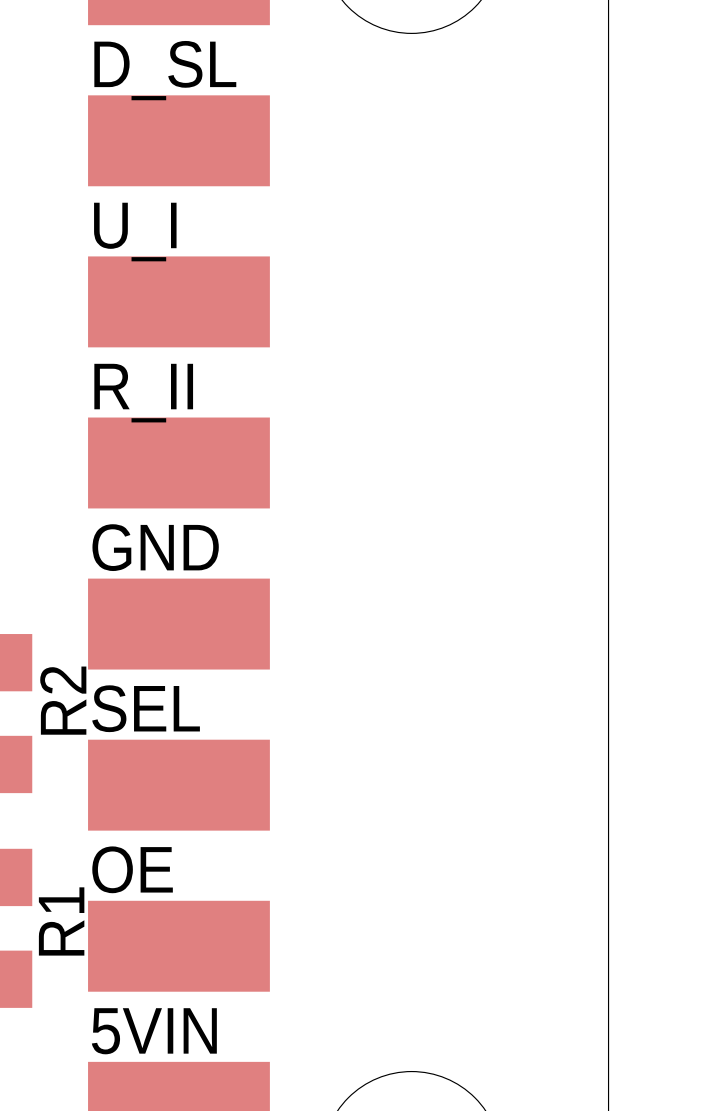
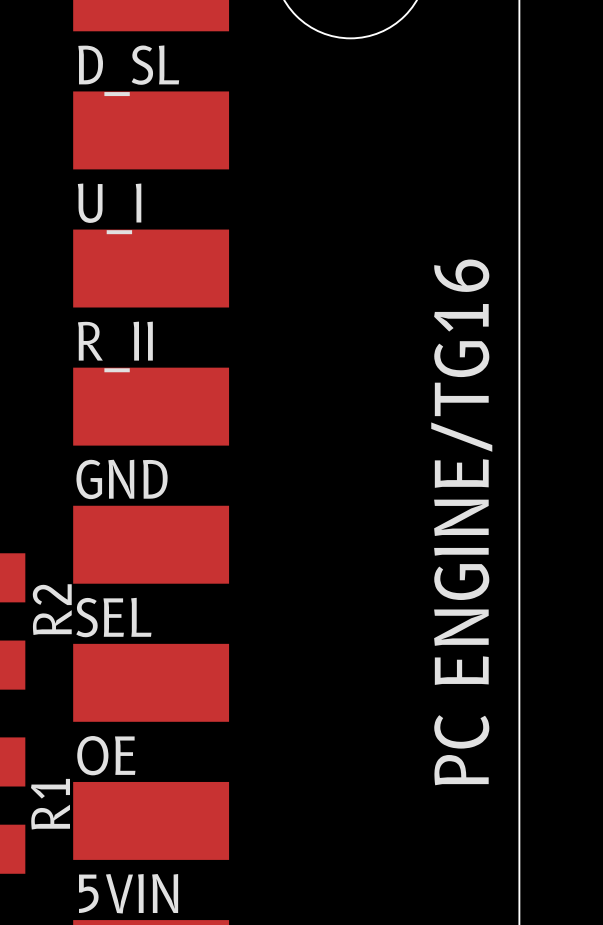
text: none -> PC ENGINE/TG16 (461, 522)

